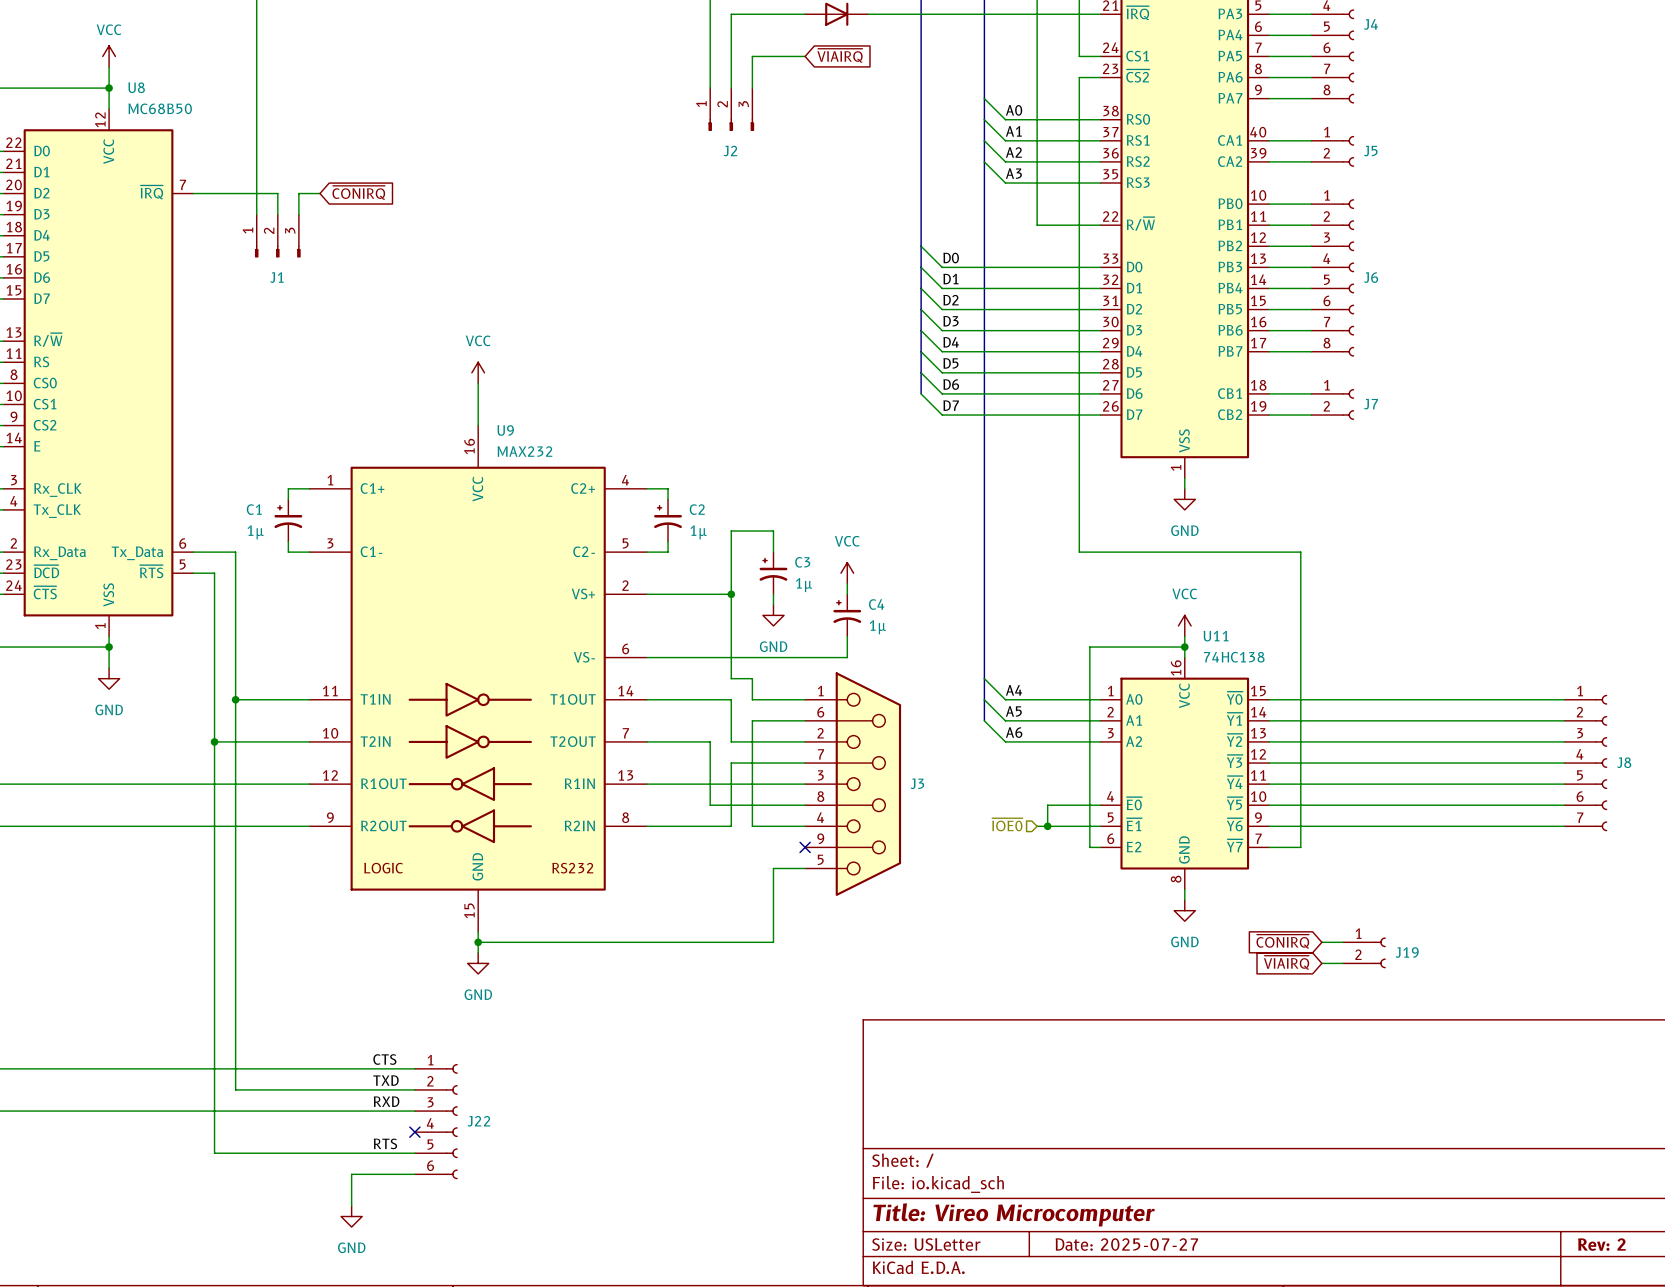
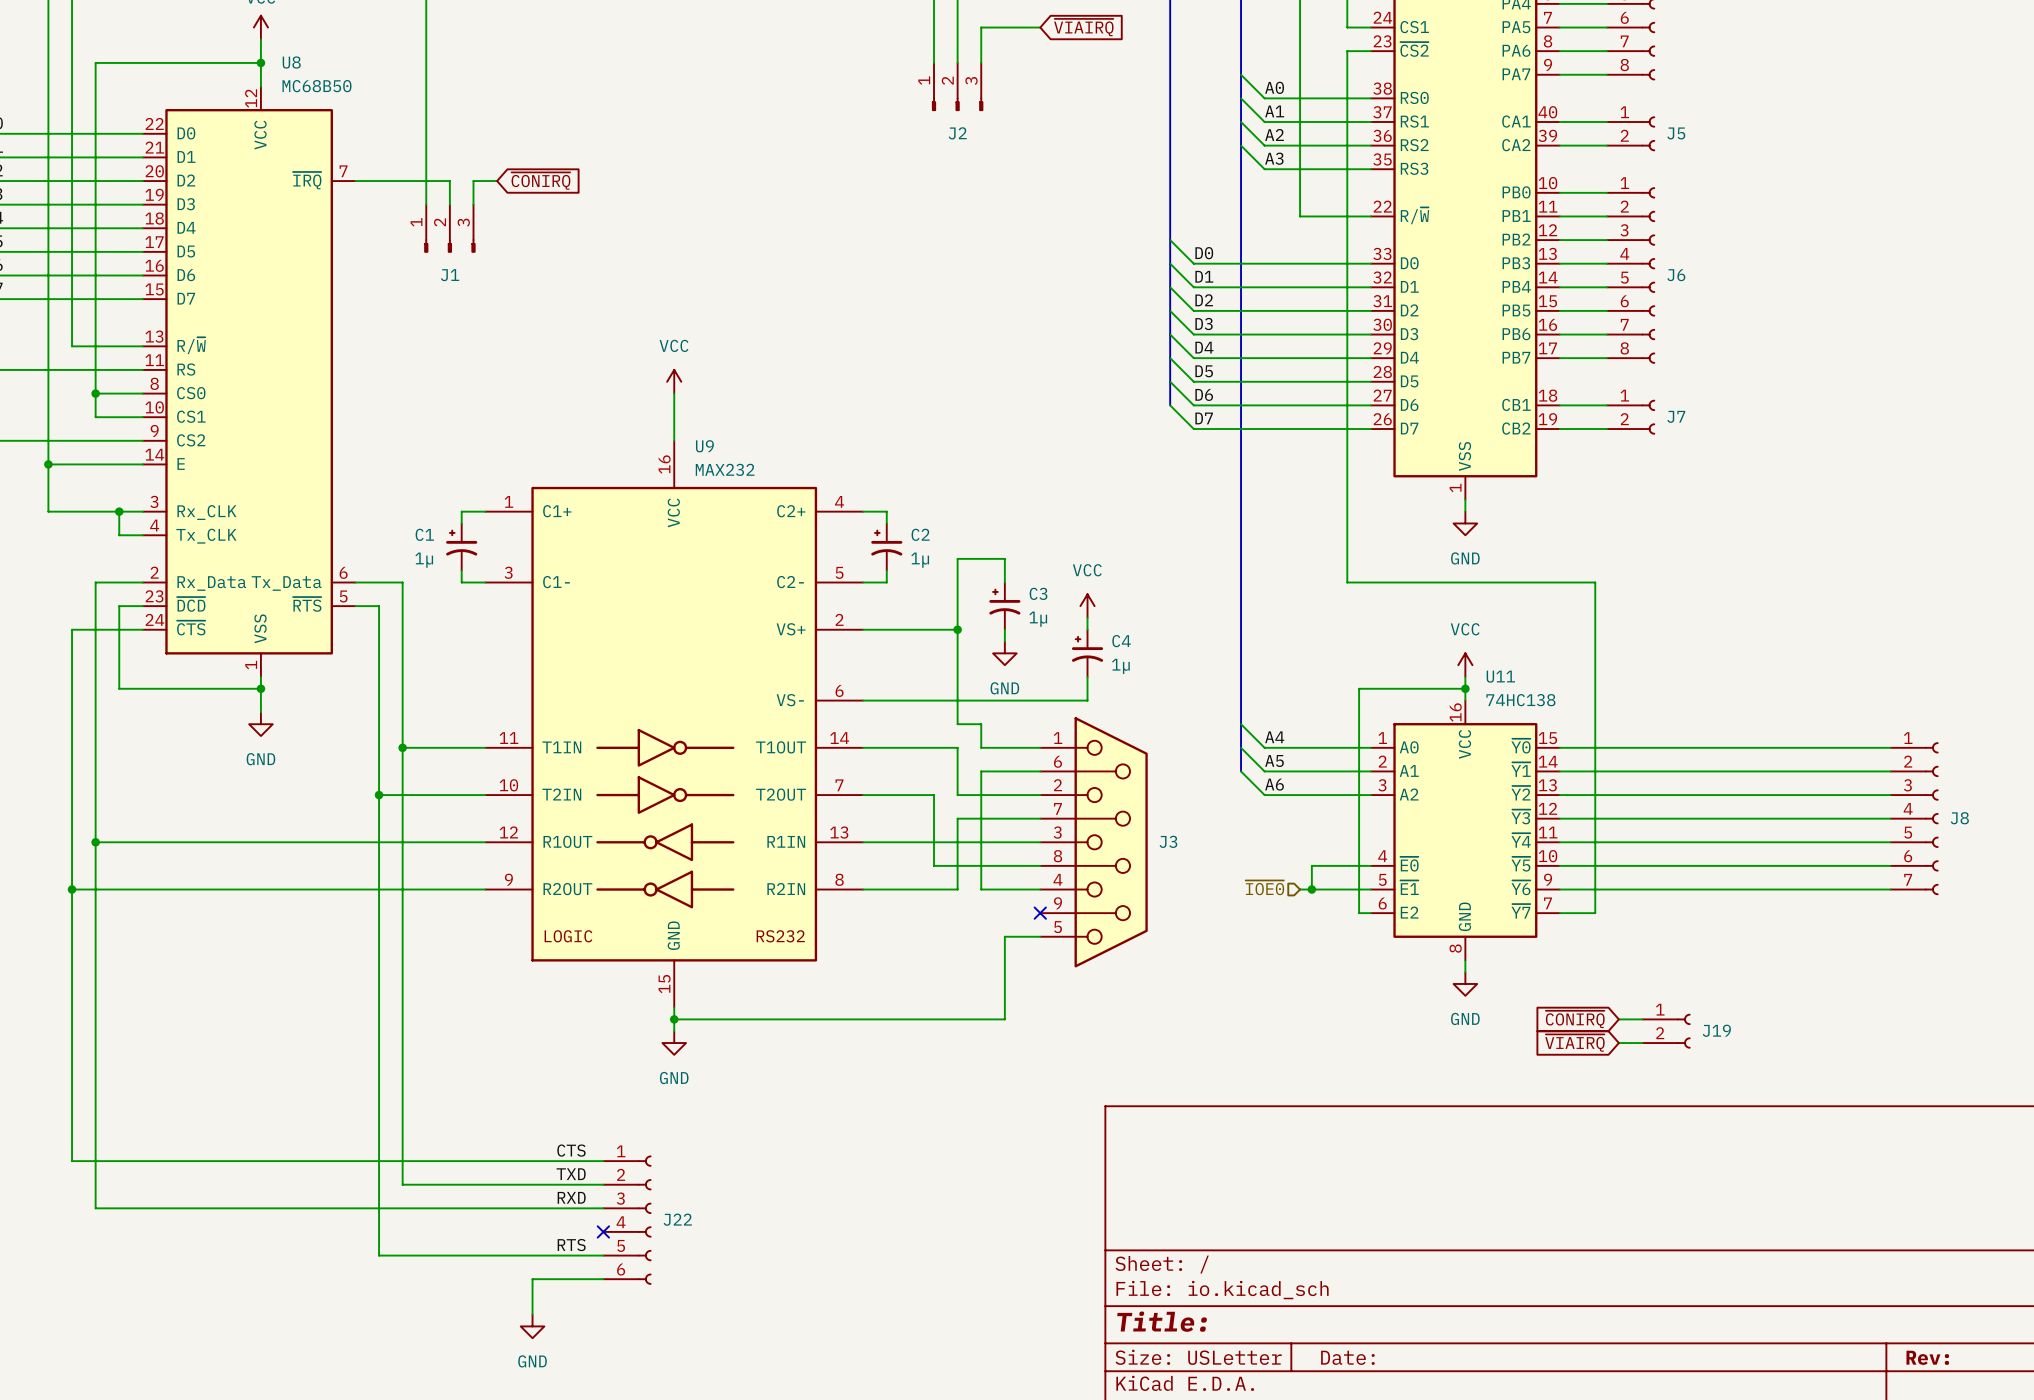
title block: Title: Vireo Microcomputer (1014, 1214) -> Title: (1162, 1321)
title block: Date: 2025-07-27 (1126, 1244) -> Date: (1347, 1357)
title block: Rev: 2 (1601, 1244) -> Rev: (1927, 1357)

